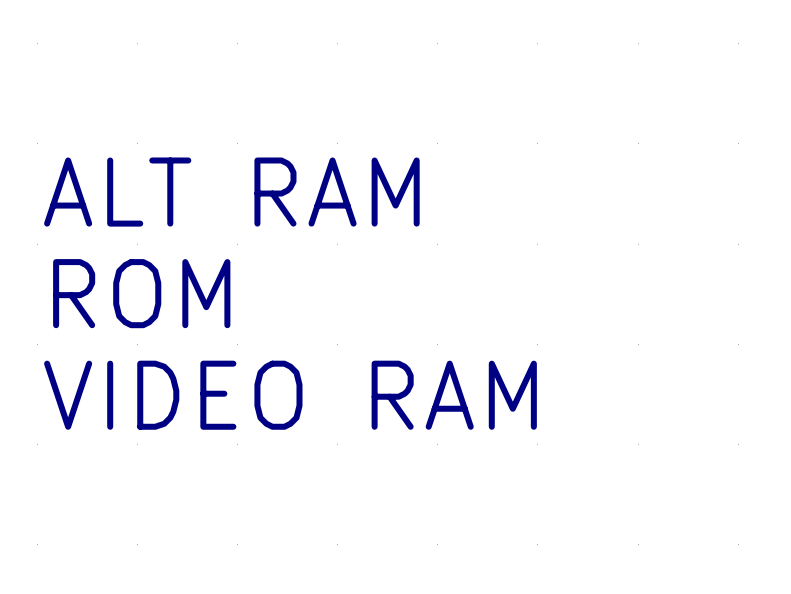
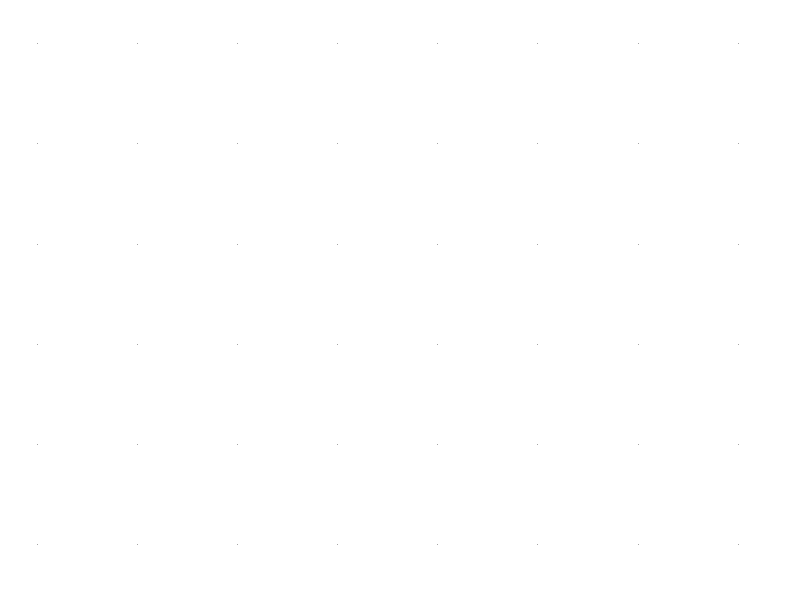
text: ALT RAM (231, 192) -> none
text: ROM (141, 293) -> none
text: VIDEO RAM (290, 395) -> none

